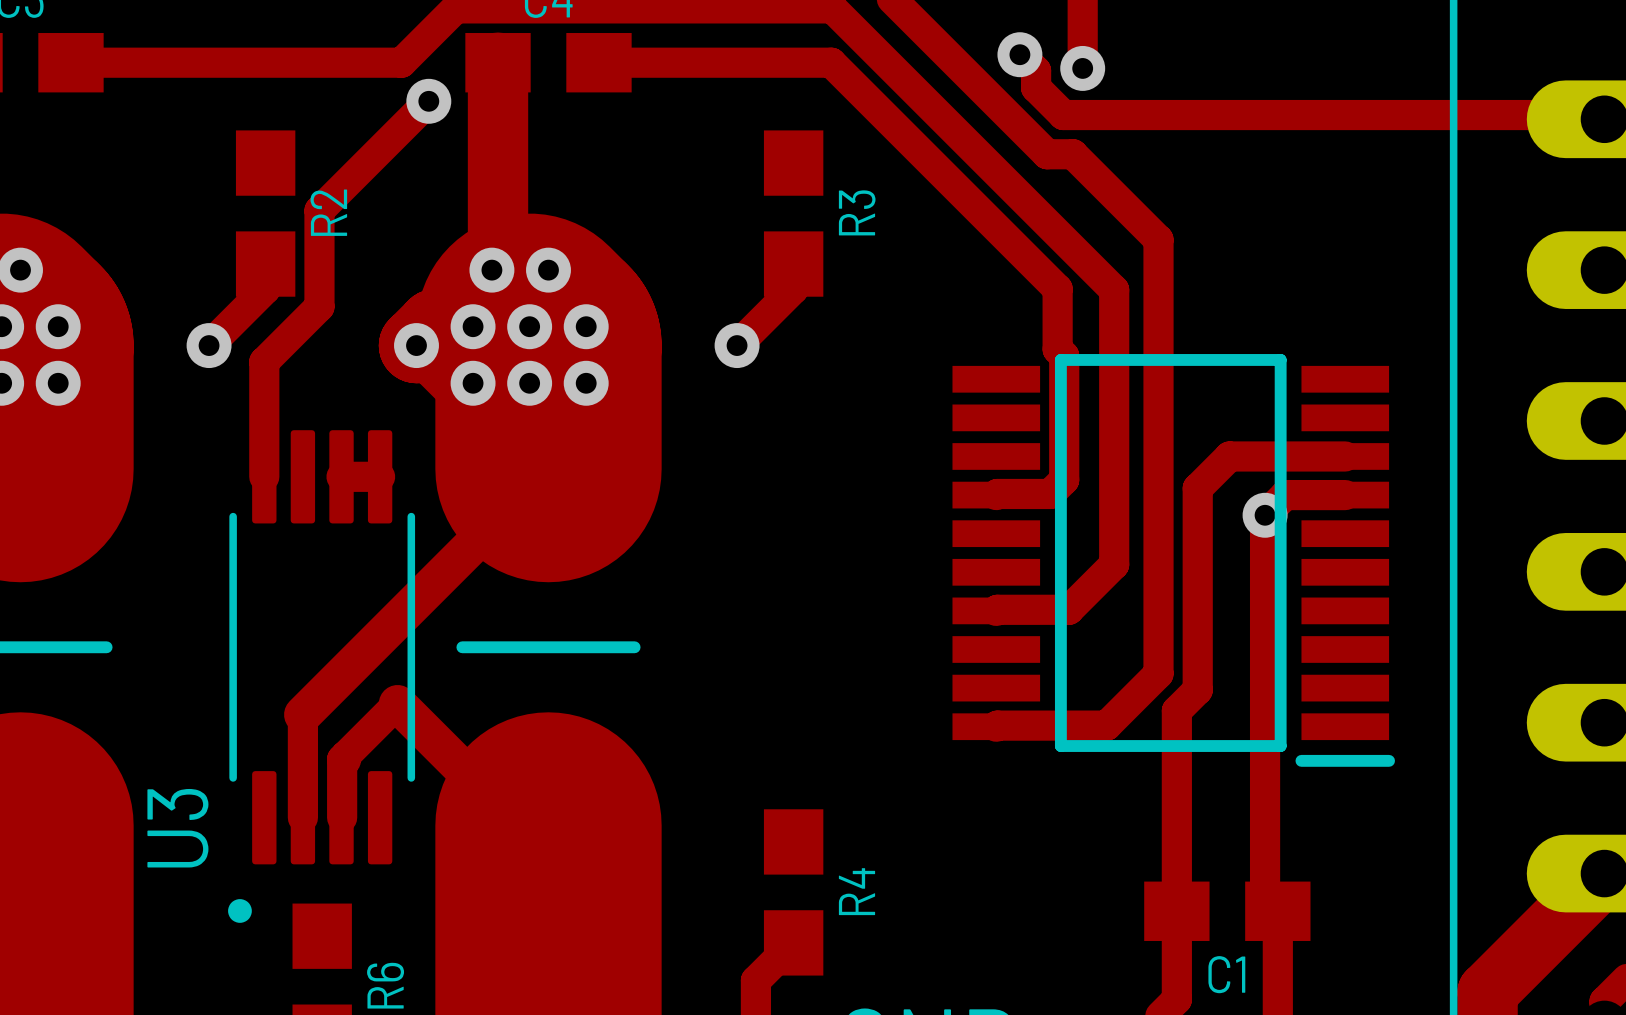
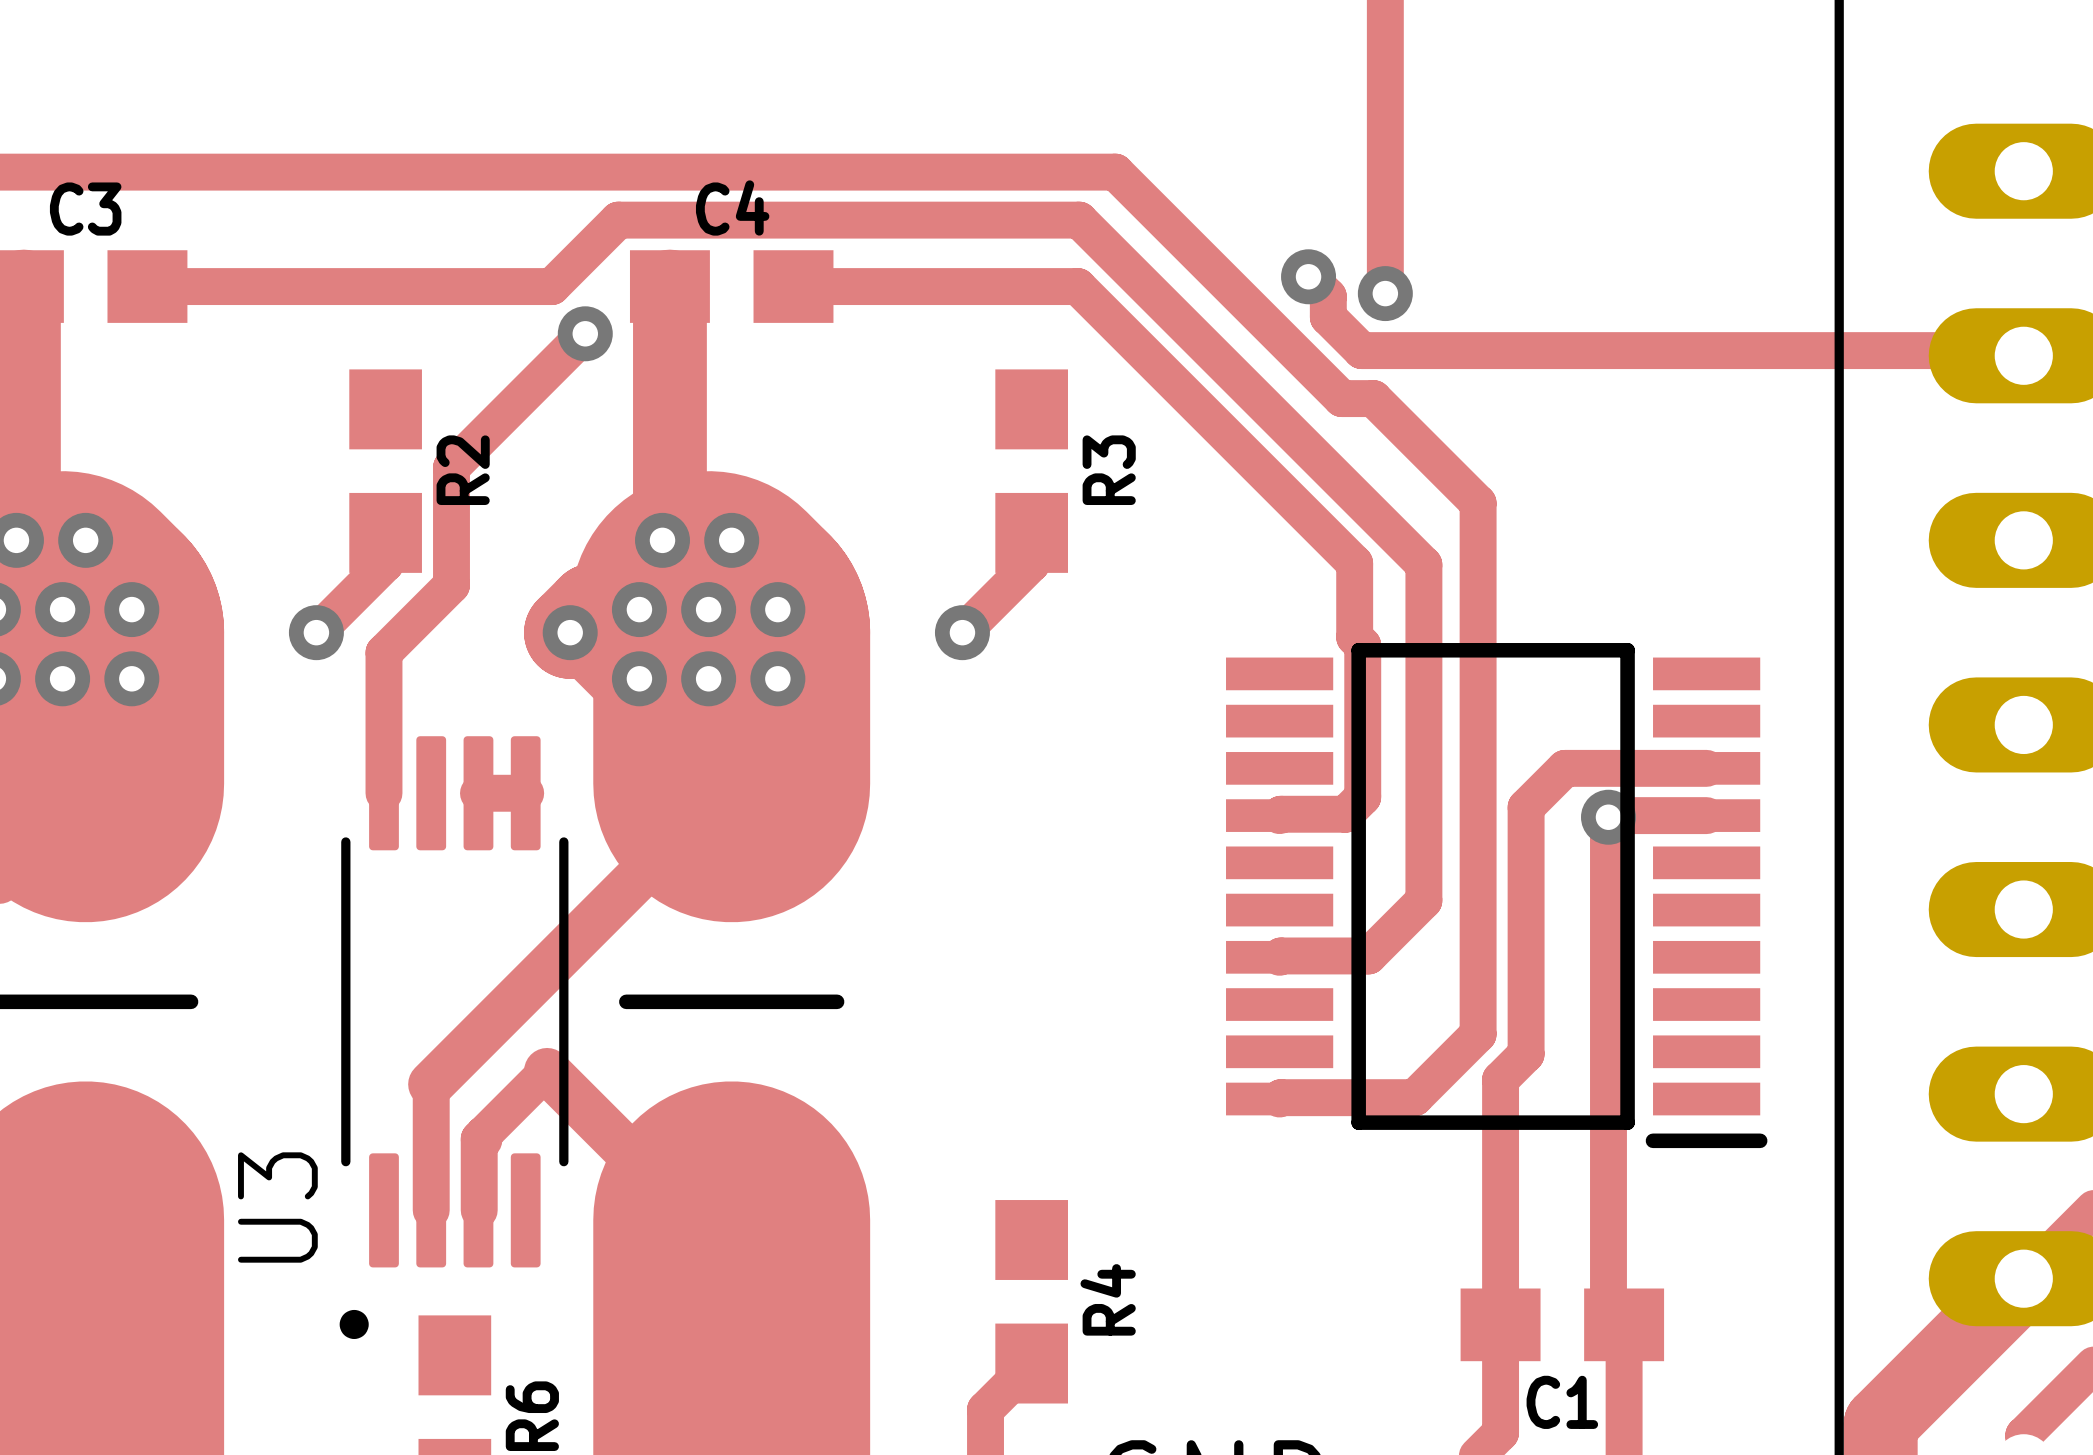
via position: (1265, 515) -> (1608, 817)

